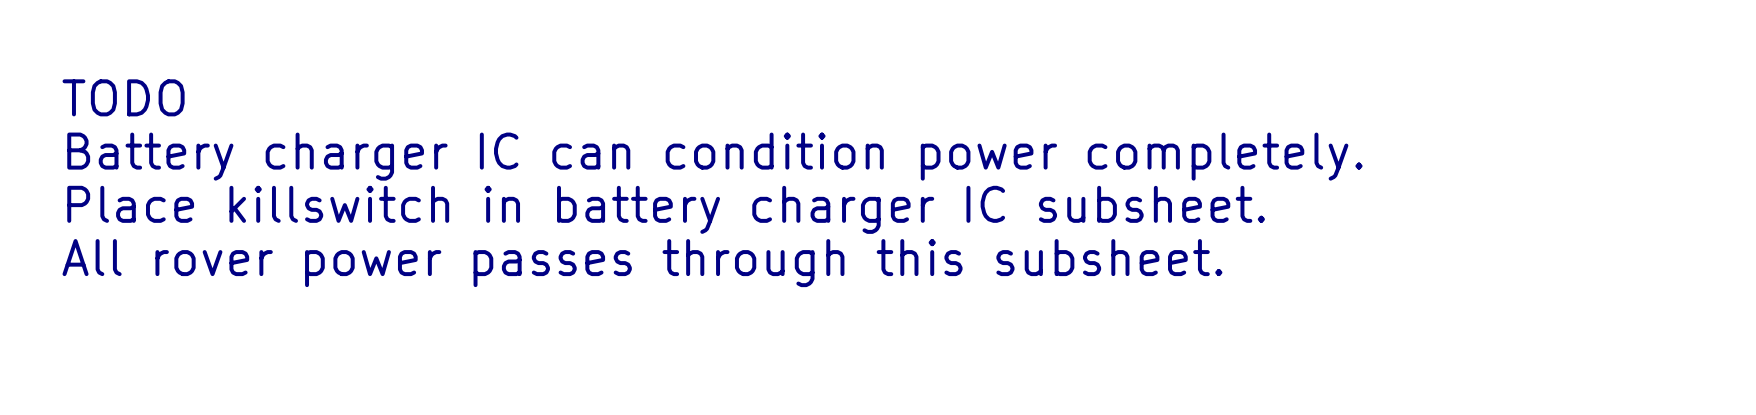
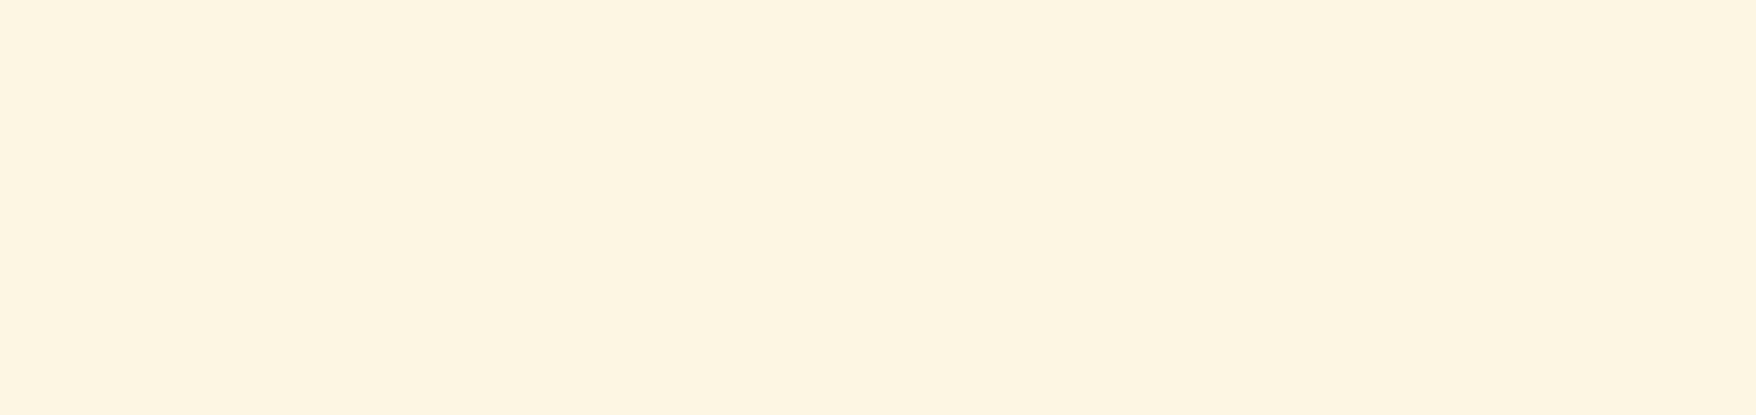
text: TODO (123, 97) -> none
text: Battery charger IC can condition power completely. (714, 156) -> none
text: Place killswitch in battery charger IC subsheet. (666, 209) -> none
text: All rover power passes through this subsheet. (642, 263) -> none

